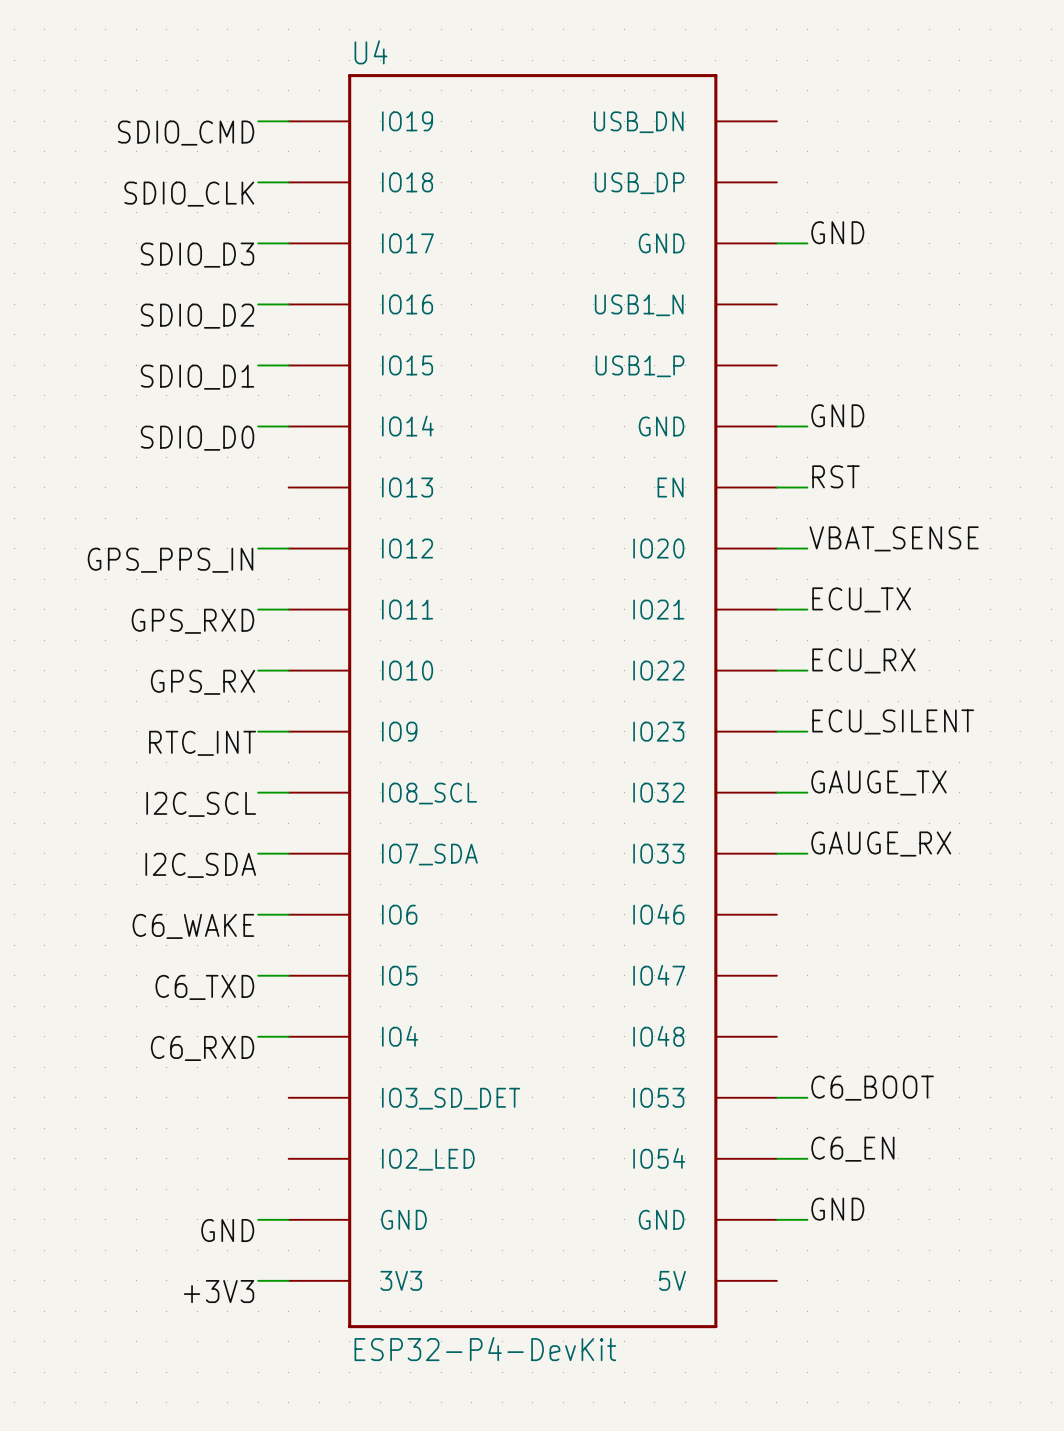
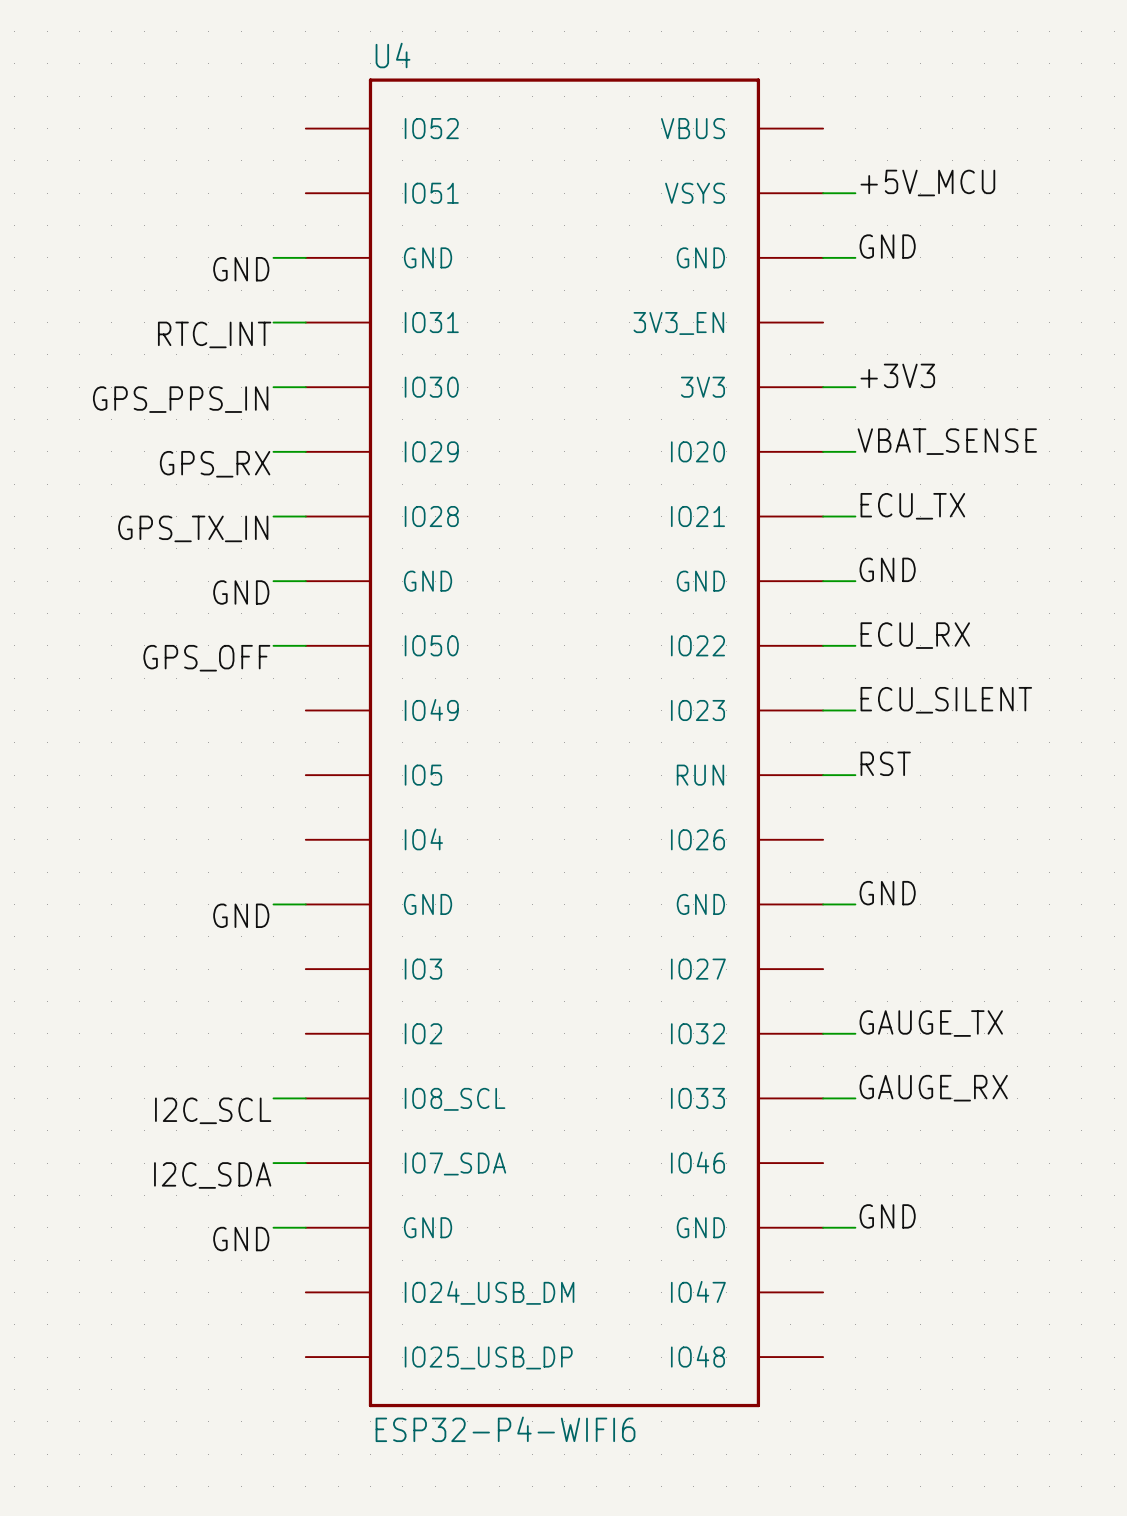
U4 symbol: [288, 74, 777, 1329] -> [305, 78, 824, 1408]
wire: (258, 121) (288, 121) -> none
label: SDIO_CMD (186, 133) -> none
label: none -> +5V_MCU (927, 183)
wire: (258, 182) (288, 182) -> none
wire: none -> (823, 193) (855, 193)
label: SDIO_CLK (189, 194) -> none
label: SDIO_D3 (197, 255) -> GND (241, 269)
label: SDIO_D2 (197, 316) -> RTC_INT (214, 334)
label: none -> +3V3 (897, 375)
wire: none -> (823, 387) (855, 387)
label: SDIO_D1 (197, 377) -> GPS_PPS_IN (180, 399)
label: GND (837, 415) -> VBAT_SENSE (947, 441)
label: SDIO_D0 (197, 438) -> GPS_RX (215, 464)
label: RST (835, 476) -> ECU_TX (912, 506)
label: none -> GPS_TX_IN (193, 528)
label: VBAT_SENSE (894, 538) -> GND (887, 569)
label: GPS_PPS_IN (170, 560) -> GND (241, 592)
label: ECU_TX (861, 599) -> ECU_RX (915, 635)
label: GPS_RXD (192, 621) -> GPS_OFF (206, 658)
label: ECU_RX (863, 660) -> ECU_SILENT (946, 700)
wire: (258, 670) (288, 670) -> (273, 516) (305, 516)
label: GPS_RX (203, 682) -> none
label: ECU_SILENT (893, 721) -> RST (885, 763)
wire: (258, 731) (288, 731) -> none
label: RTC_INT (202, 743) -> none
label position: GAUGE_TX (878, 782) -> GAUGE_TX (931, 1023)
wire: (258, 792) (288, 792) -> none
wire: (776, 792) (807, 792) -> none
label: I2C_SCL (201, 804) -> none
label: GAUGE_RX (881, 844) -> GND (887, 893)
label: I2C_SDA (200, 865) -> GND (241, 915)
wire: (258, 914) (288, 914) -> none
label: C6_WAKE (193, 926) -> none
wire: (258, 975) (288, 975) -> none
label: C6_TXD (204, 987) -> none
label: none -> GAUGE_RX (933, 1088)
label: C6_RXD (202, 1048) -> I2C_SCL (213, 1110)
label: C6_BOOT (872, 1088) -> none
wire: (776, 1097) (807, 1097) -> (823, 1033) (855, 1033)
label: none -> I2C_SDA (212, 1175)
label: C6_EN (852, 1149) -> GND (887, 1216)
label: GND (837, 1209) -> none
wire: (258, 1219) (288, 1219) -> (273, 1163) (305, 1163)
wire: (776, 1219) (807, 1219) -> (823, 1098) (855, 1098)
label position: GND (227, 1230) -> GND (241, 1239)
wire: (258, 1280) (288, 1280) -> (273, 1227) (305, 1227)
label: +3V3 (219, 1291) -> none
U4 value: ESP32-P4-DevKit (485, 1349) -> ESP32-P4-WIFI6 (505, 1429)

